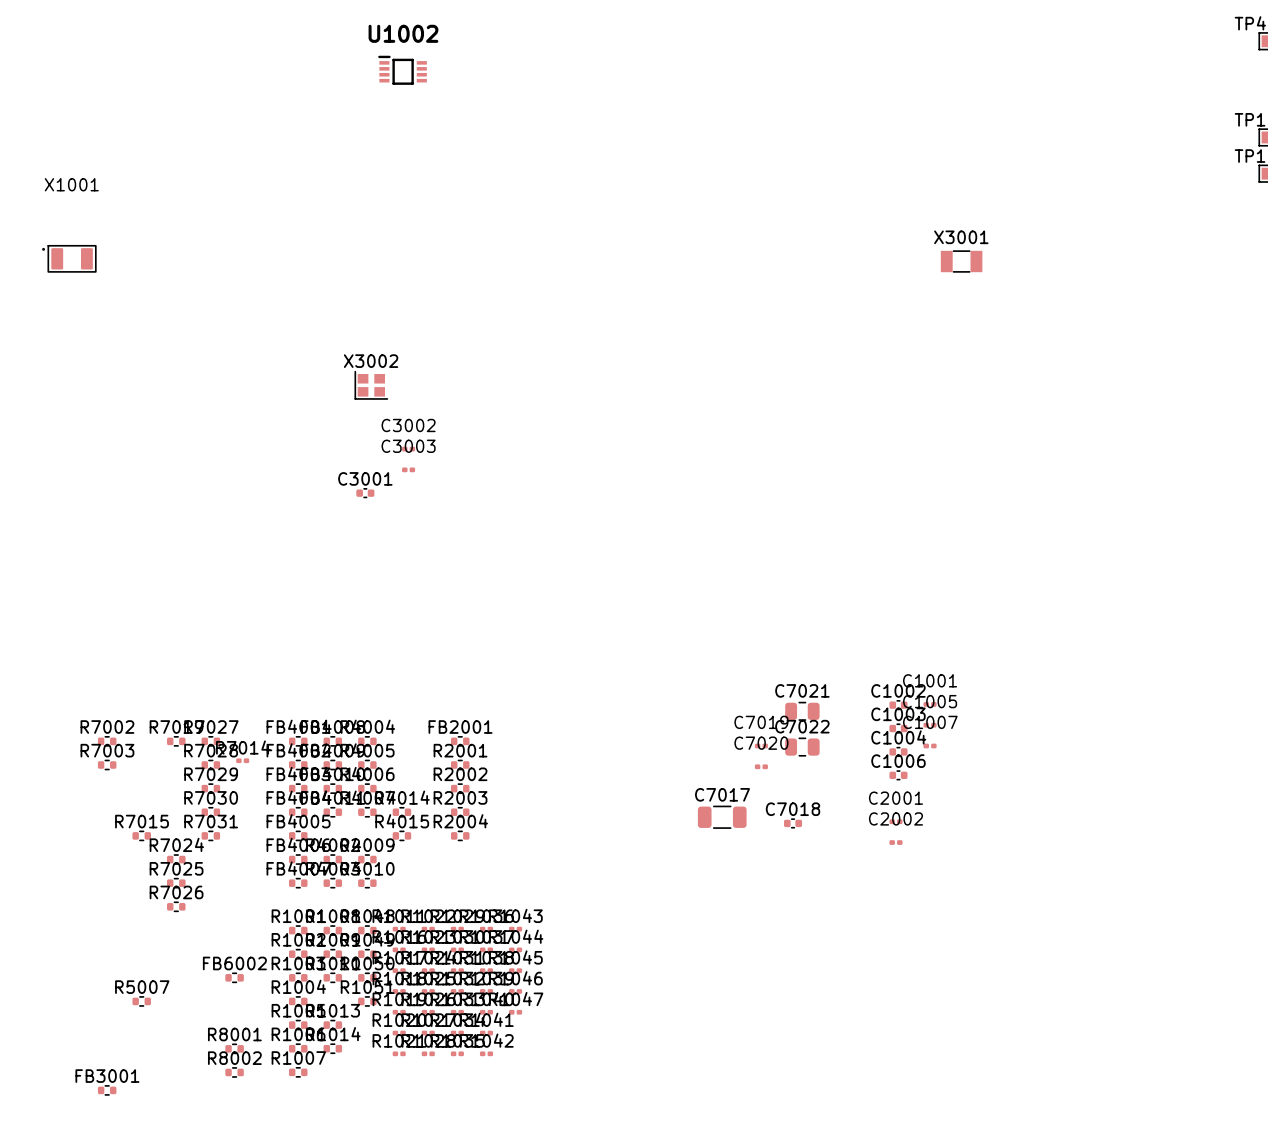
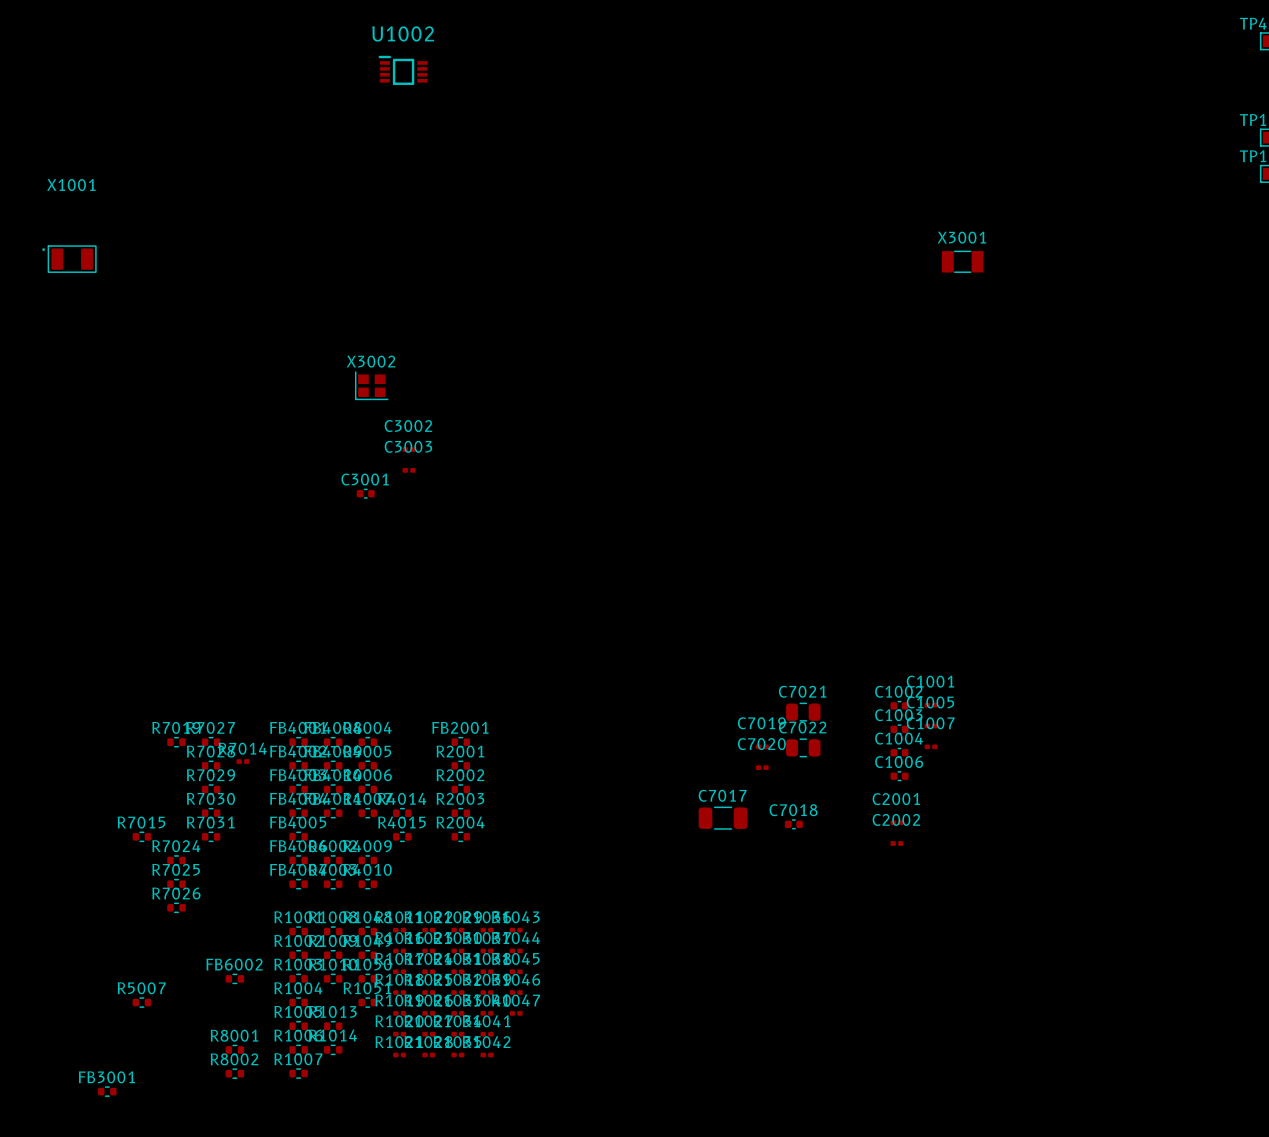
R7002: (107, 741) -> none
R7003: (107, 765) -> none

